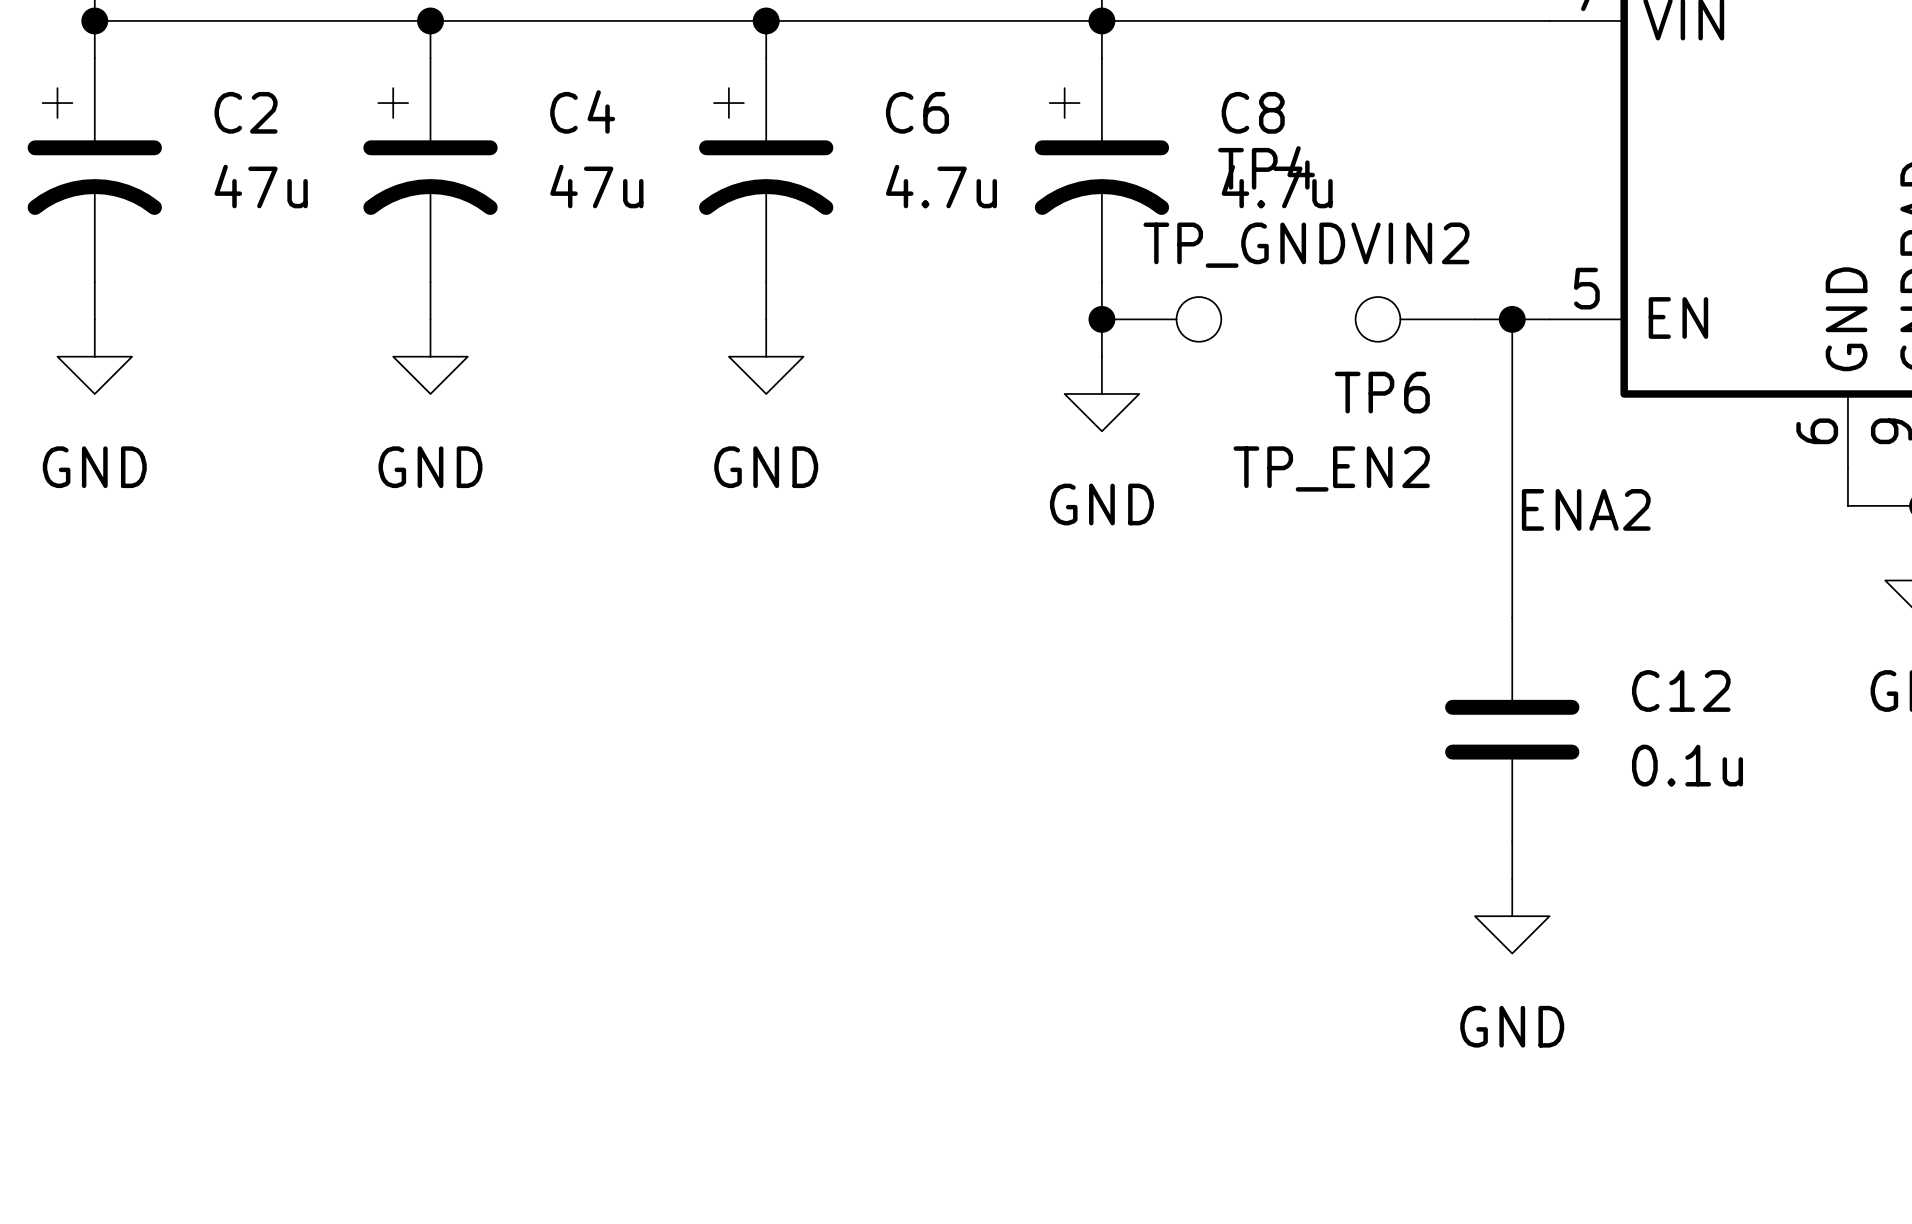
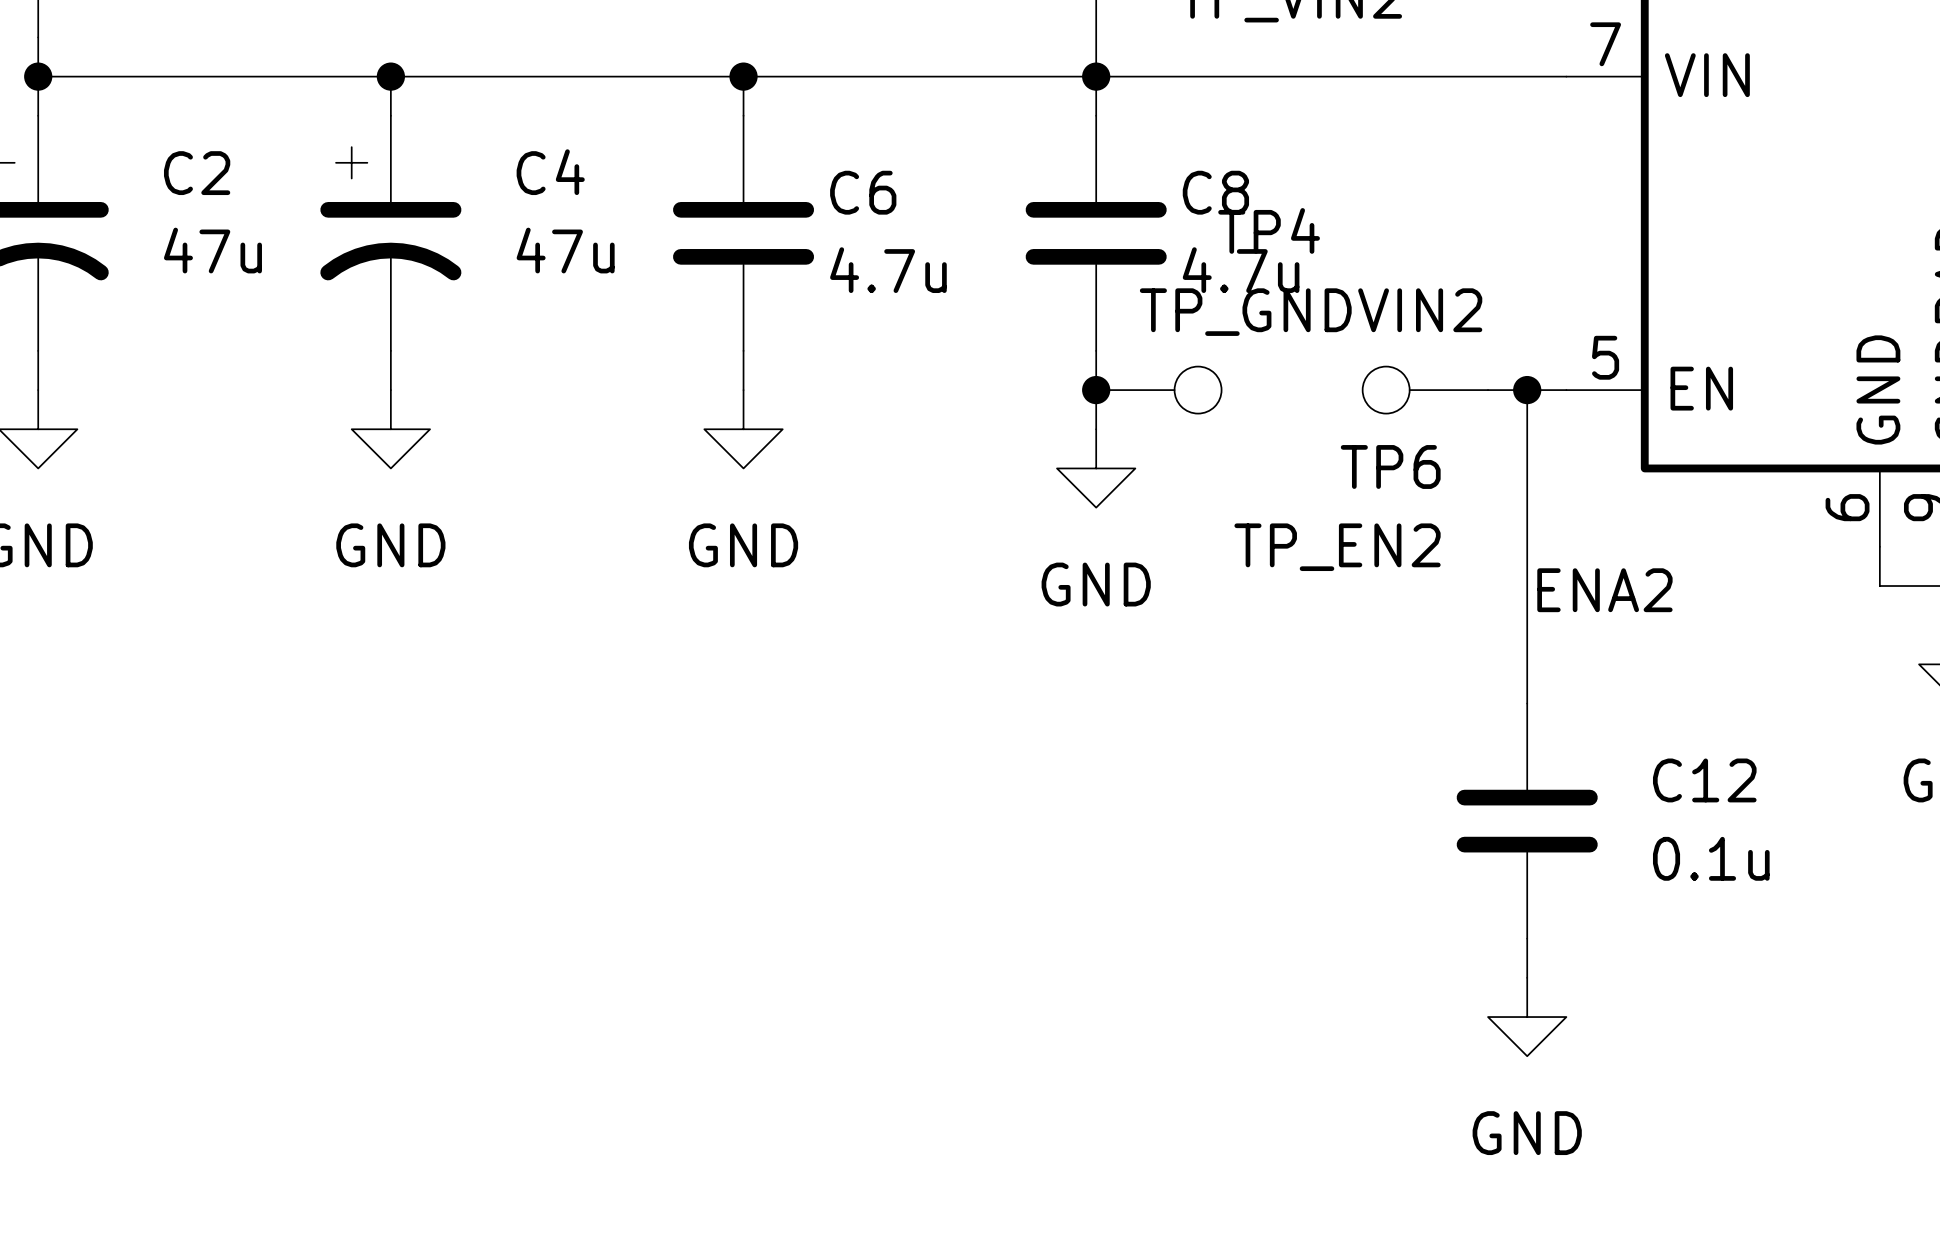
C6 symbol: [699, 58, 834, 283] -> [673, 115, 815, 351]
C8 symbol: [1034, 58, 1170, 283] -> [1025, 115, 1167, 351]

